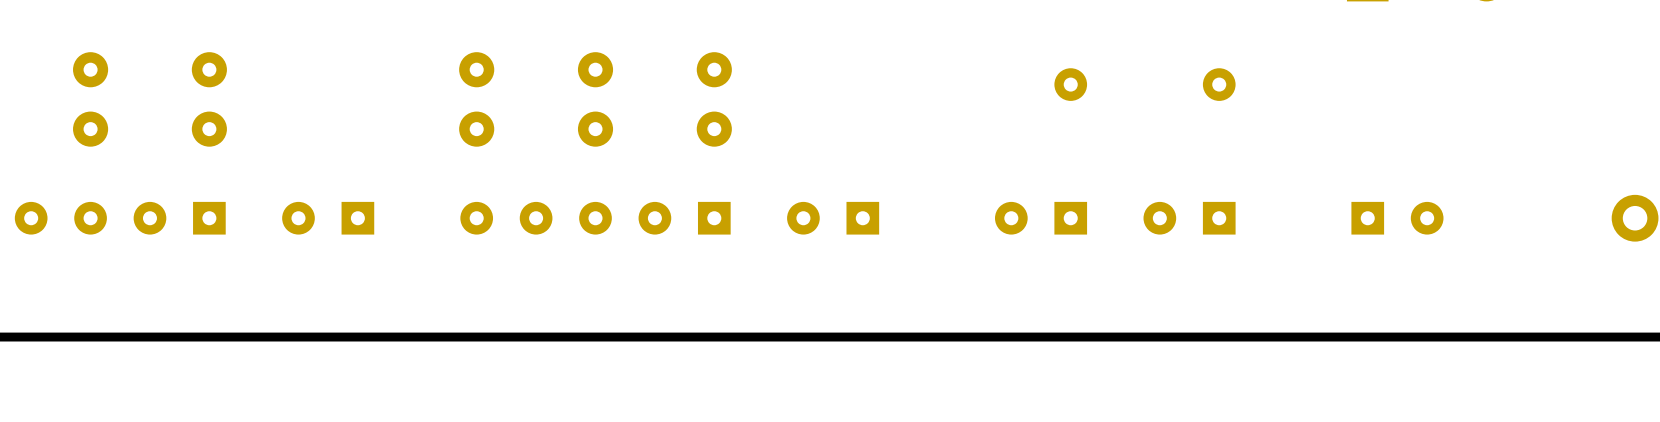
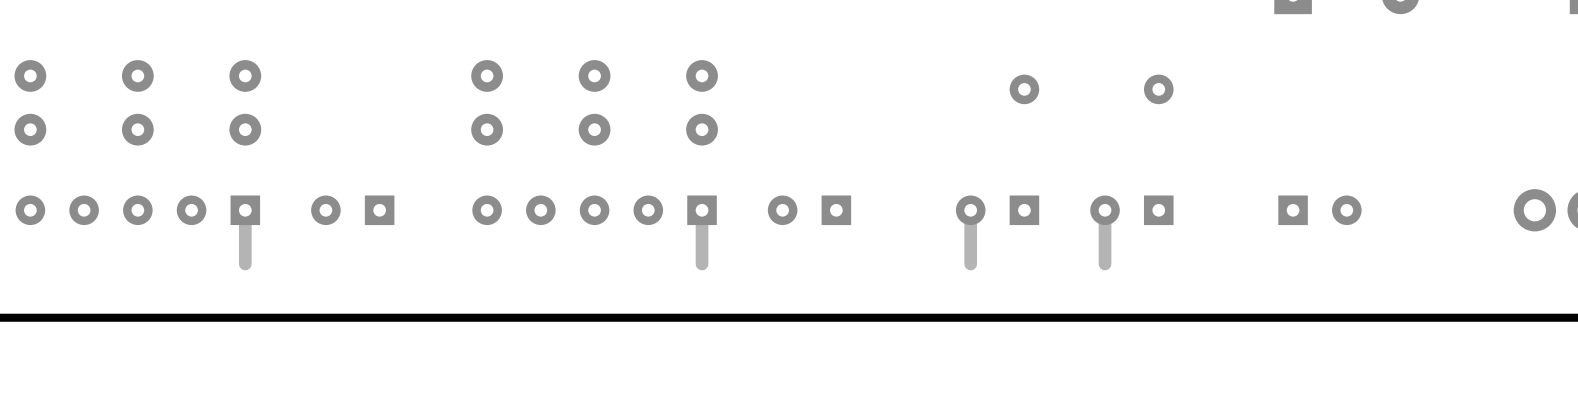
track: none -> (245, 210) (245, 264)
track: none -> (702, 210) (702, 264)
track: none -> (970, 210) (970, 264)
track: none -> (1105, 210) (1105, 264)

